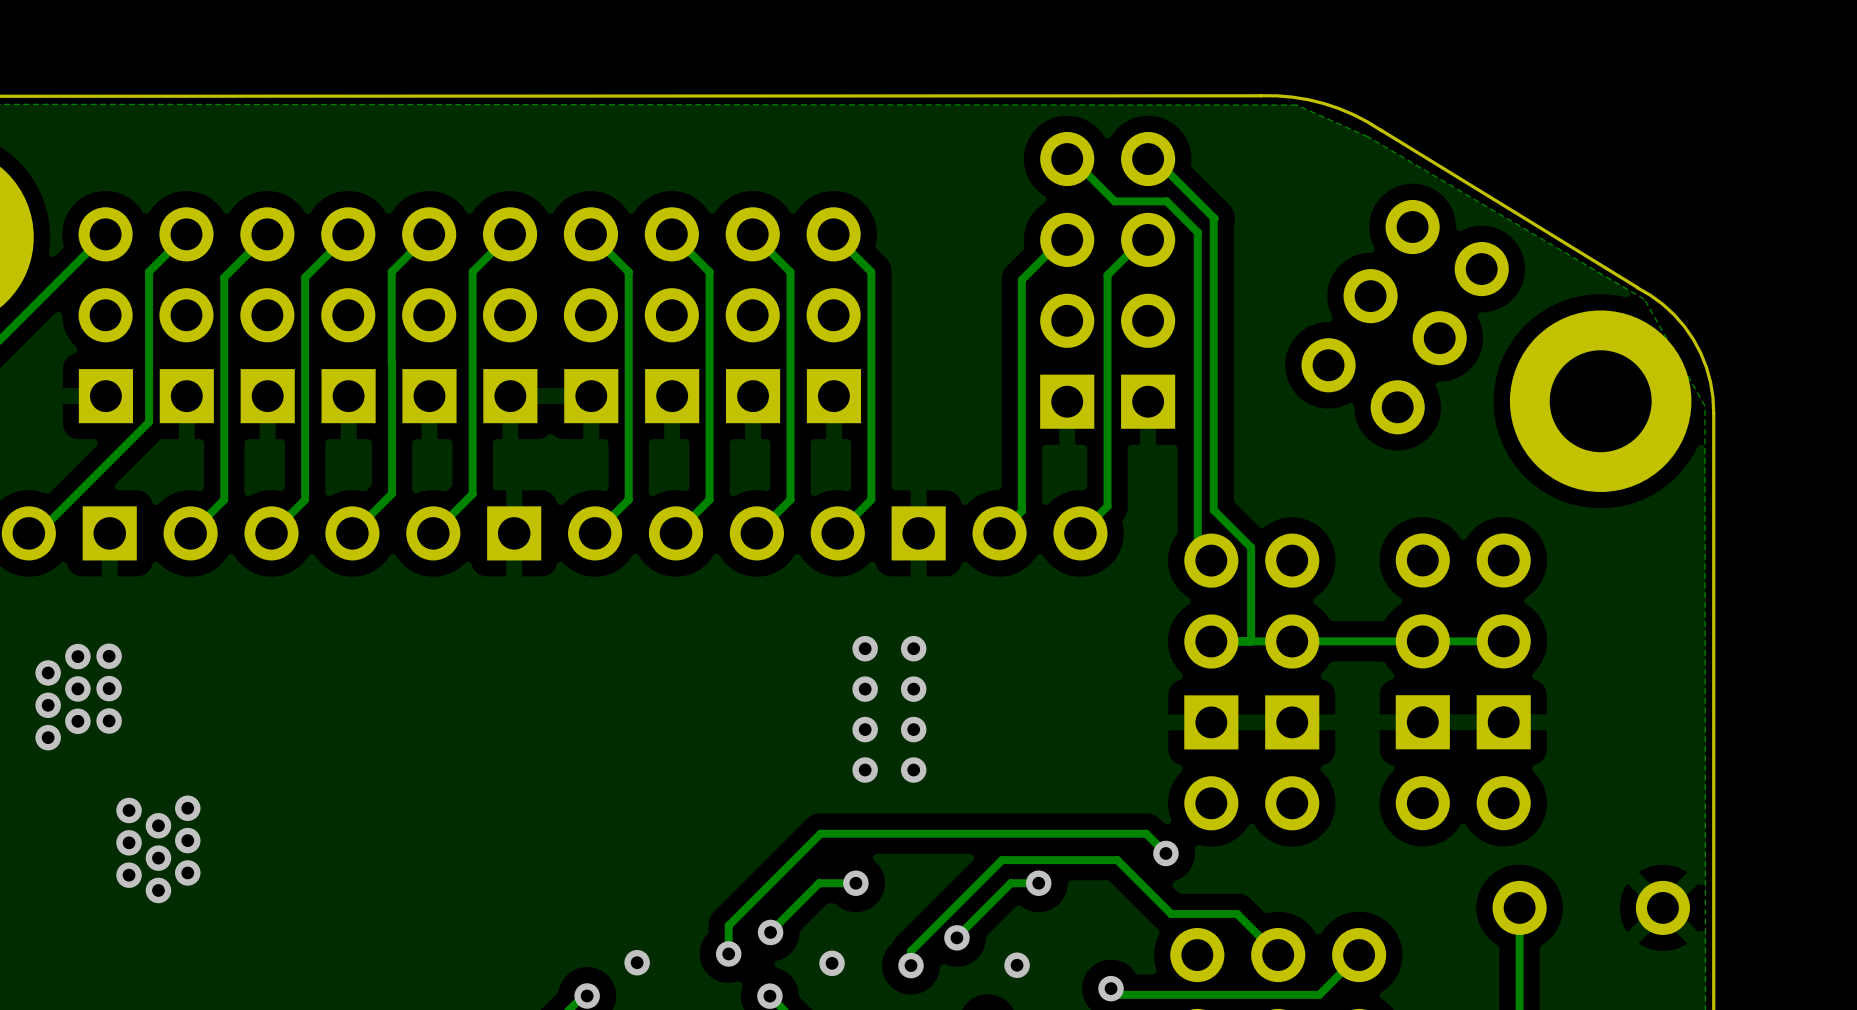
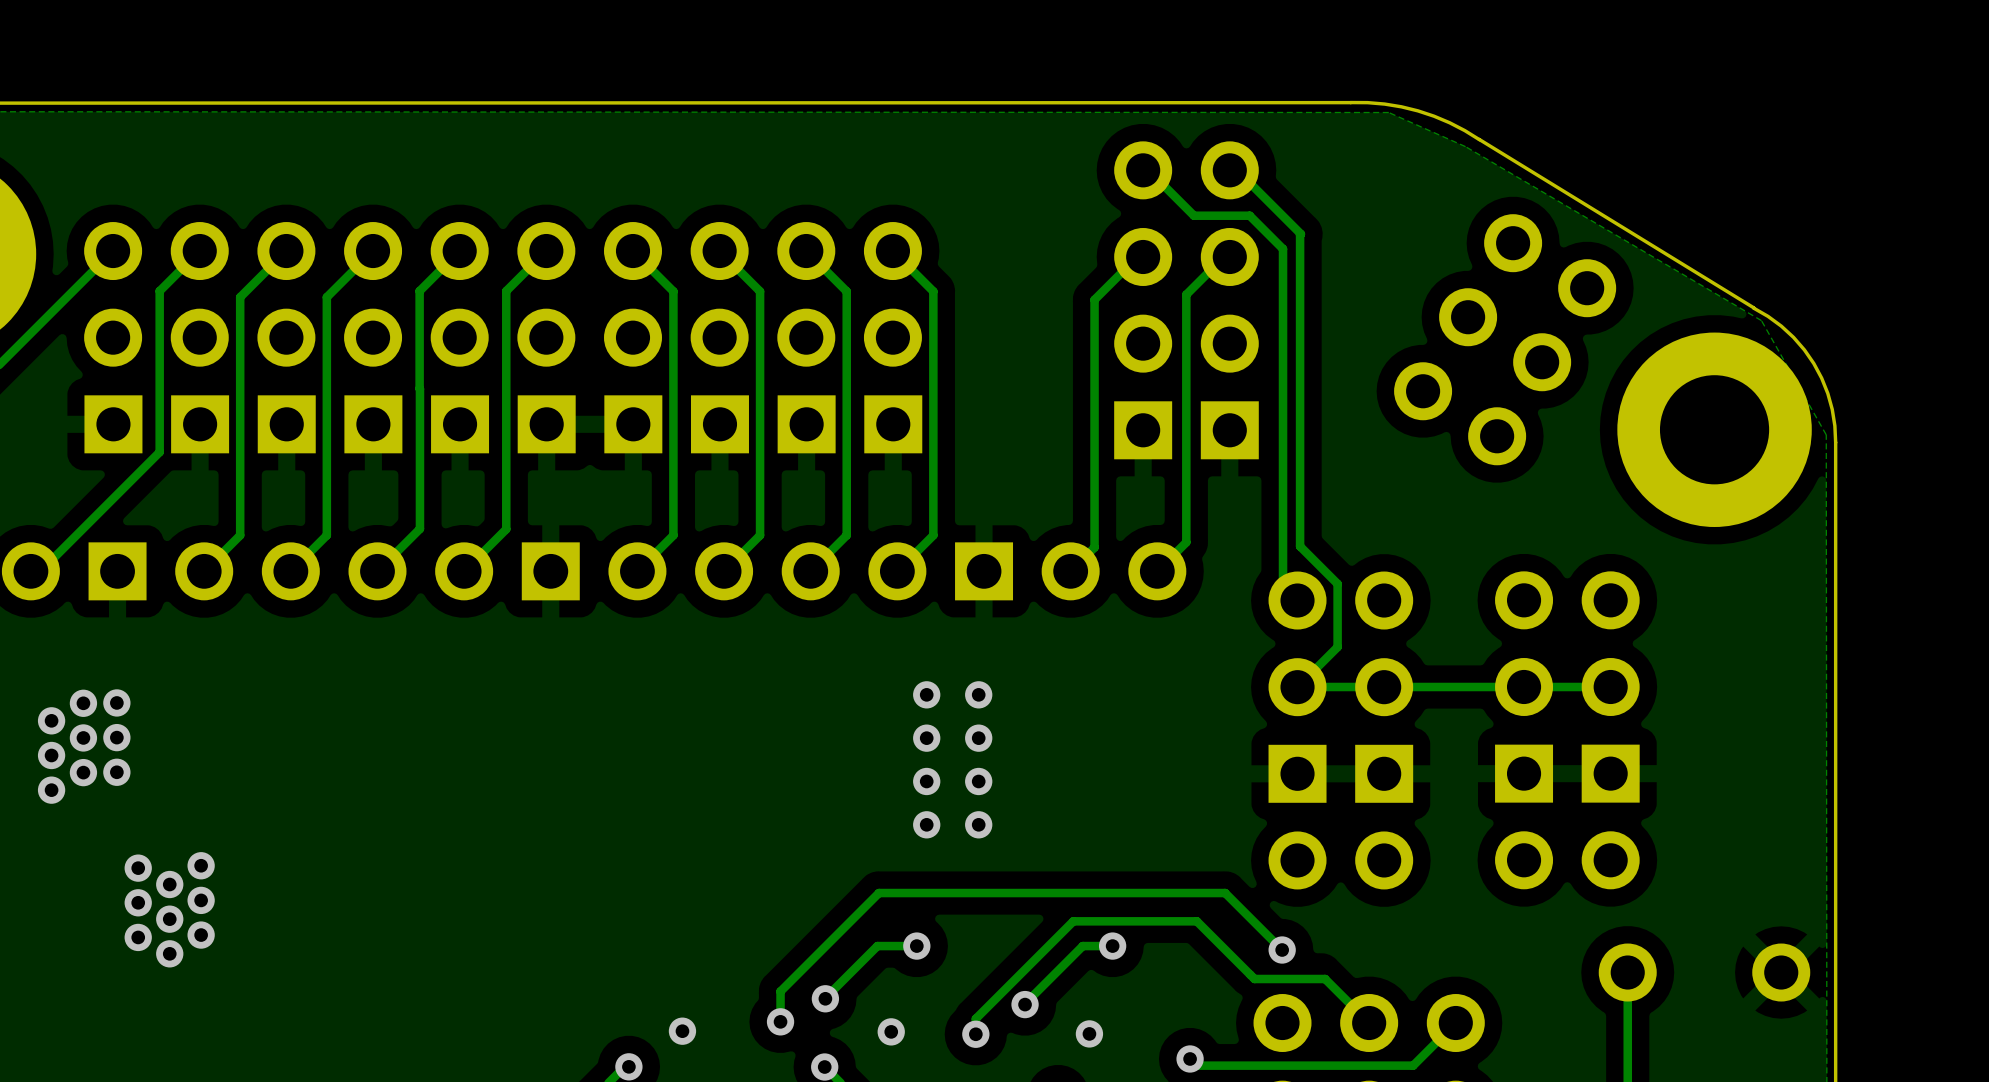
track: (1248, 545) (1251, 547) (1251, 641) -> (1337, 583) (1337, 647) (1297, 687)
track: (1143, 833) (1146, 833) (1165, 853) -> (1225, 893) (1282, 950)
via position: (1165, 853) -> (1282, 950)

